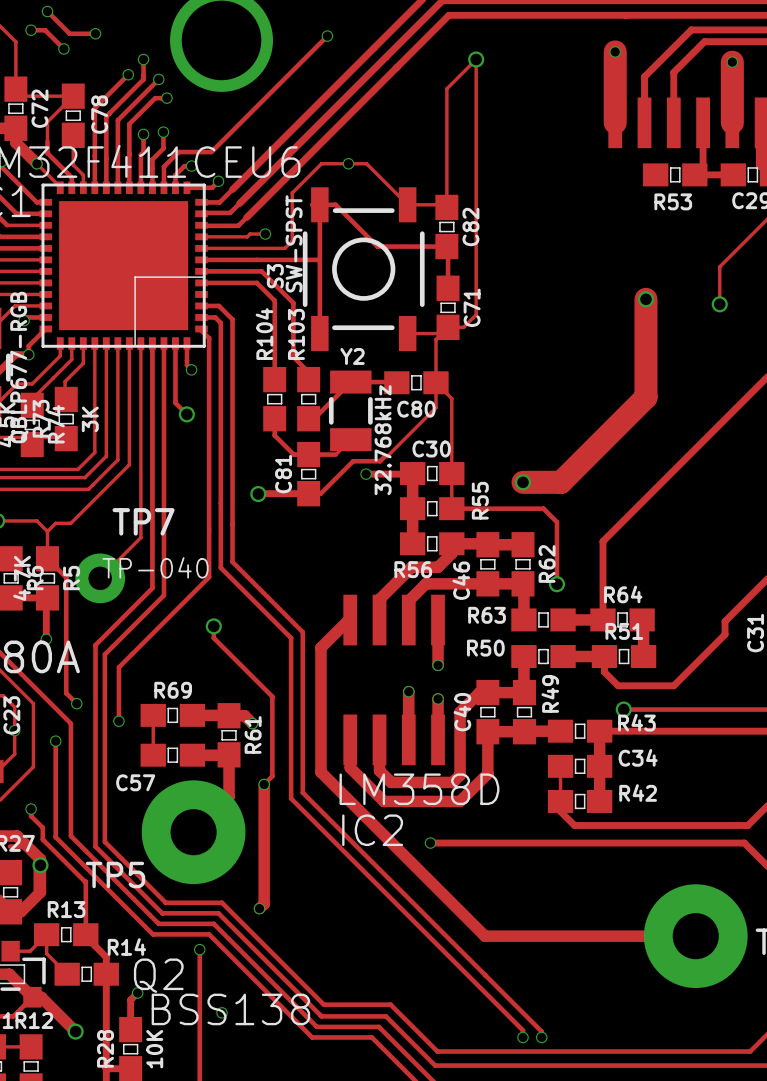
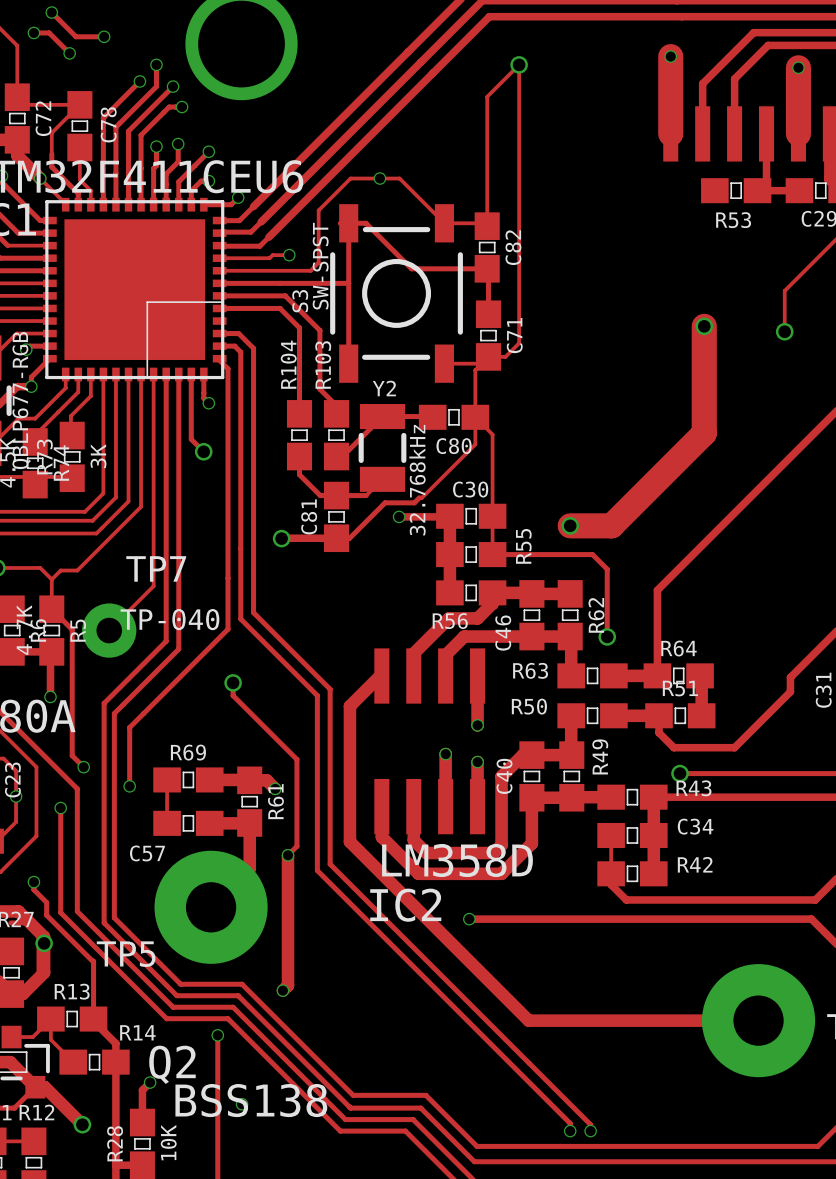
track: (327, 36) (211, 152) (178, 152) -> (208, 151) (194, 165)
via: (327, 36) -> none
via: none -> (208, 151)

